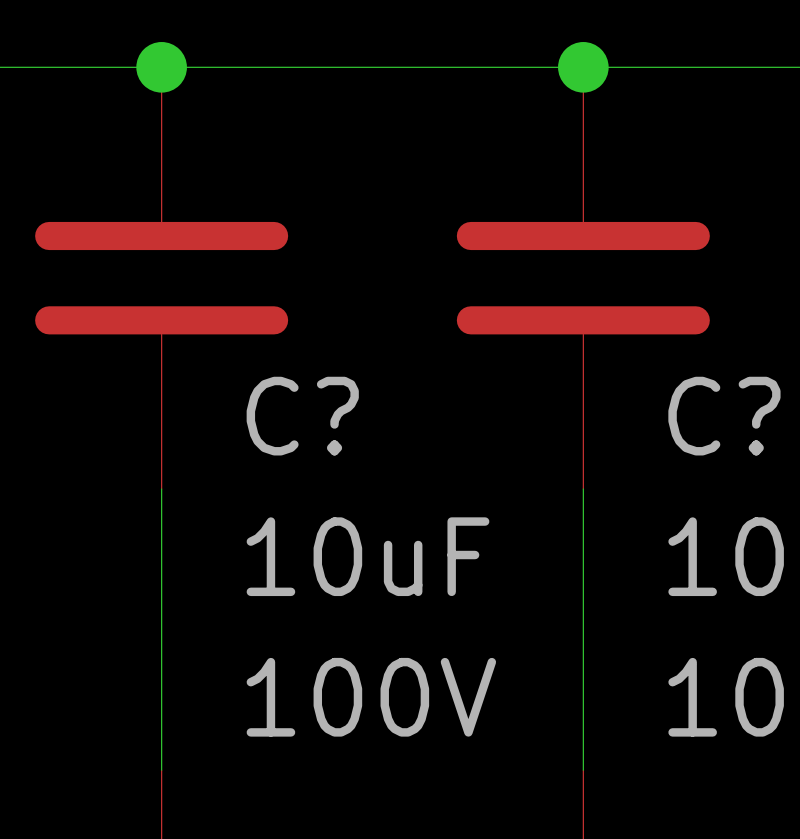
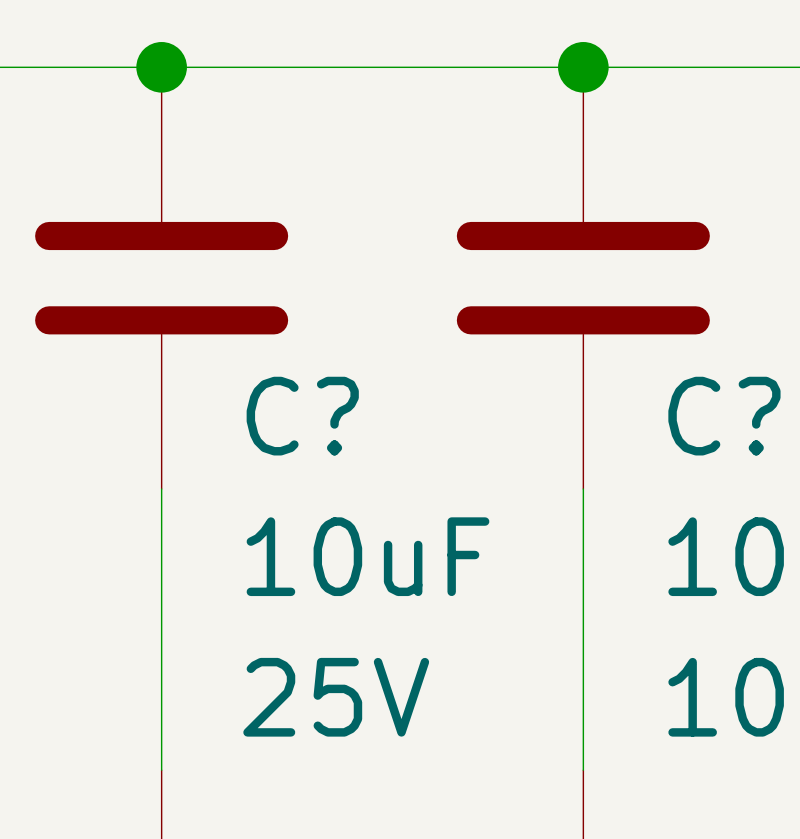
C? text: 100V (371, 697) -> 25V (336, 697)

